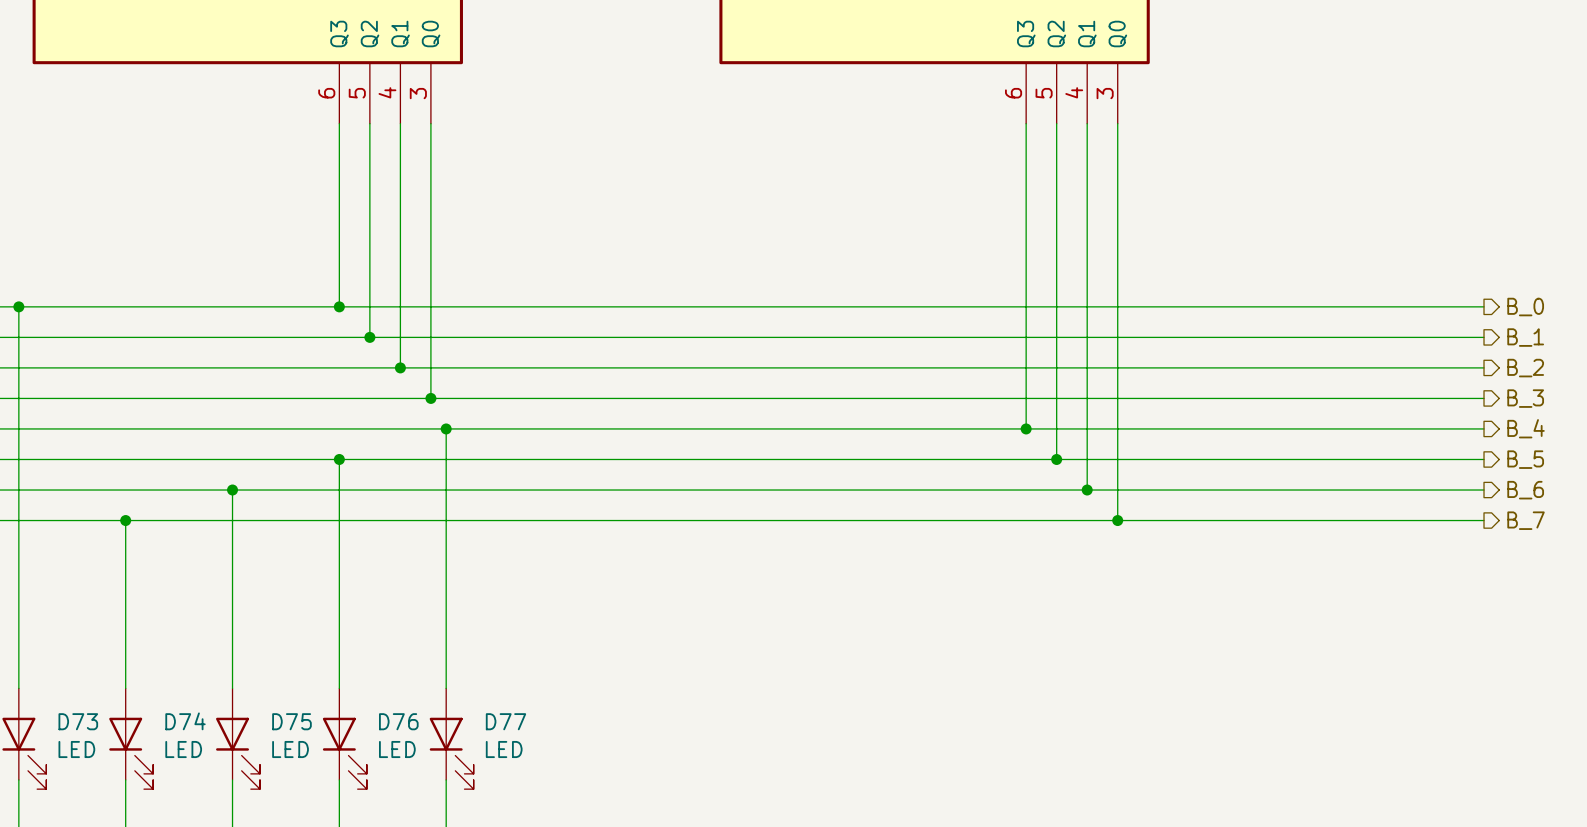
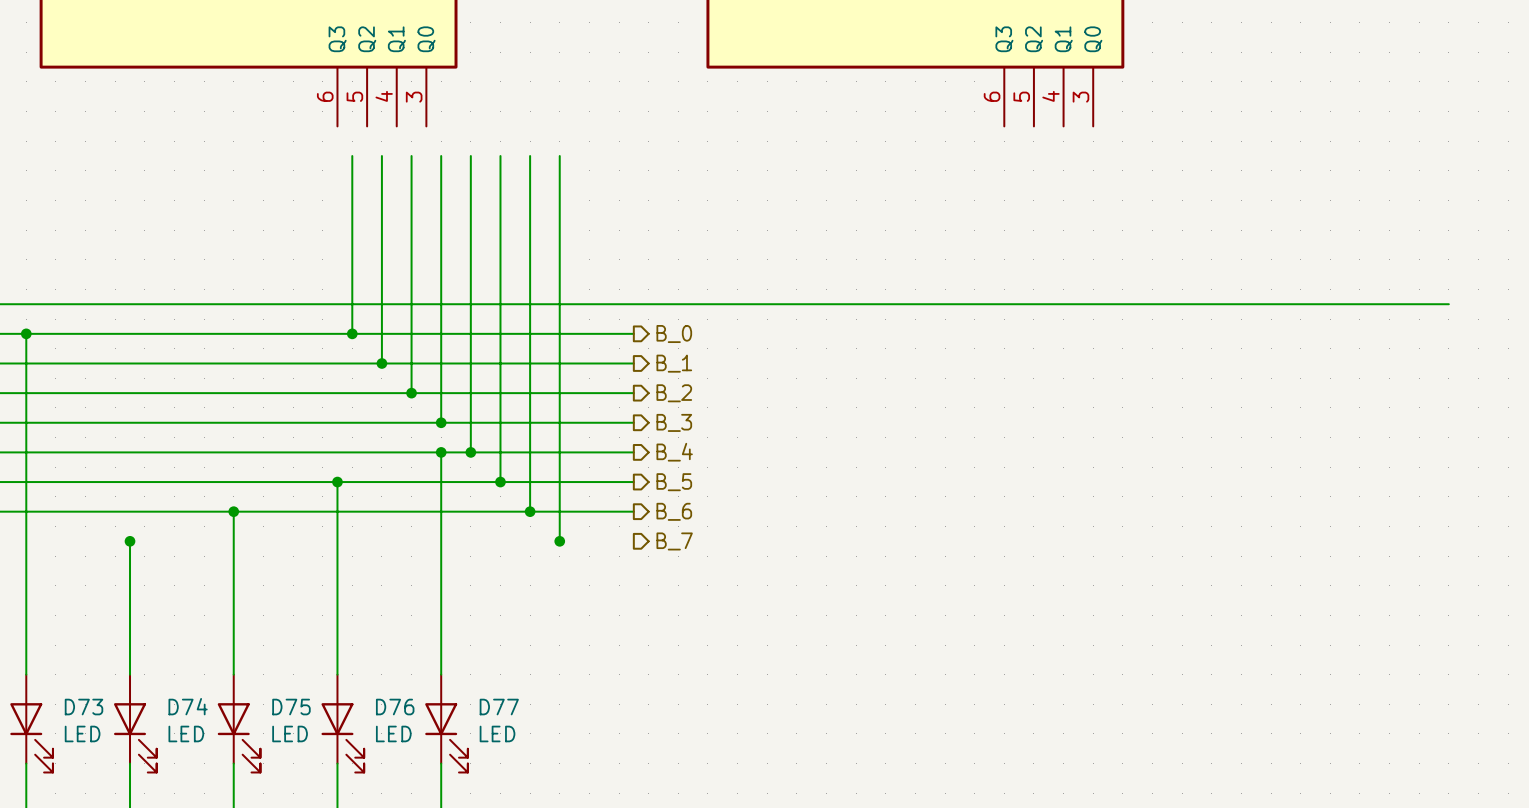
wire: (339, 123) (339, 306) -> (352, 156) (352, 333)
wire: (369, 123) (369, 337) -> (381, 156) (381, 363)
wire: (400, 123) (400, 367) -> (411, 156) (411, 393)
wire: (430, 123) (430, 398) -> none
wire: (1026, 123) (1026, 428) -> none
wire: (1056, 123) (1056, 459) -> none
wire: (1087, 123) (1087, 490) -> none
wire: (1117, 123) (1117, 520) -> none
wire: none -> (470, 156) (470, 452)
wire: none -> (500, 156) (500, 482)
wire: none -> (530, 156) (530, 511)
wire: none -> (559, 156) (559, 541)
wire: (18, 306) (18, 337) -> none
junction position: (18, 306) -> (26, 333)
junction: (339, 306) -> none
hierarchical label: B_0 (1525, 307) -> none
junction position: (369, 337) -> (352, 333)
wire: (644, 337) (1484, 337) -> none
hierarchical label: none -> B_0 (674, 334)
hierarchical label: B_1 (1525, 337) -> none
junction position: (400, 367) -> (381, 363)
wire: (644, 367) (1484, 367) -> none
hierarchical label: none -> B_1 (674, 363)
hierarchical label: B_2 (1525, 368) -> none
junction position: (430, 398) -> (411, 393)
wire: (644, 398) (1484, 398) -> none
hierarchical label: none -> B_2 (674, 393)
hierarchical label: B_3 (1525, 398) -> none
wire: (446, 428) (446, 459) -> (441, 422) (441, 156)
wire: (644, 428) (1484, 428) -> none
junction: (1026, 428) -> none
hierarchical label: B_4 (1526, 428) -> none
hierarchical label: none -> B_3 (674, 422)
wire: (339, 459) (339, 490) -> none
junction position: (339, 459) -> (337, 482)
junction: none -> (441, 452)
junction: none -> (470, 452)
wire: (644, 459) (1484, 459) -> none
hierarchical label: none -> B_4 (674, 452)
junction: (1056, 459) -> none
hierarchical label: B_5 (1525, 459) -> none
wire: (232, 490) (232, 520) -> none
junction position: (232, 490) -> (233, 511)
junction: none -> (500, 482)
wire: (644, 490) (1484, 490) -> none
hierarchical label: none -> B_5 (674, 482)
junction: (1087, 490) -> none
hierarchical label: B_6 (1525, 490) -> none
wire: (125, 520) (125, 551) -> none
junction position: (125, 520) -> (130, 541)
junction: none -> (530, 511)
wire: (644, 520) (1484, 520) -> none
hierarchical label: none -> B_6 (674, 511)
junction: (1117, 520) -> none
hierarchical label: B_7 (1526, 520) -> none
junction: none -> (559, 541)
hierarchical label: none -> B_7 (674, 541)

